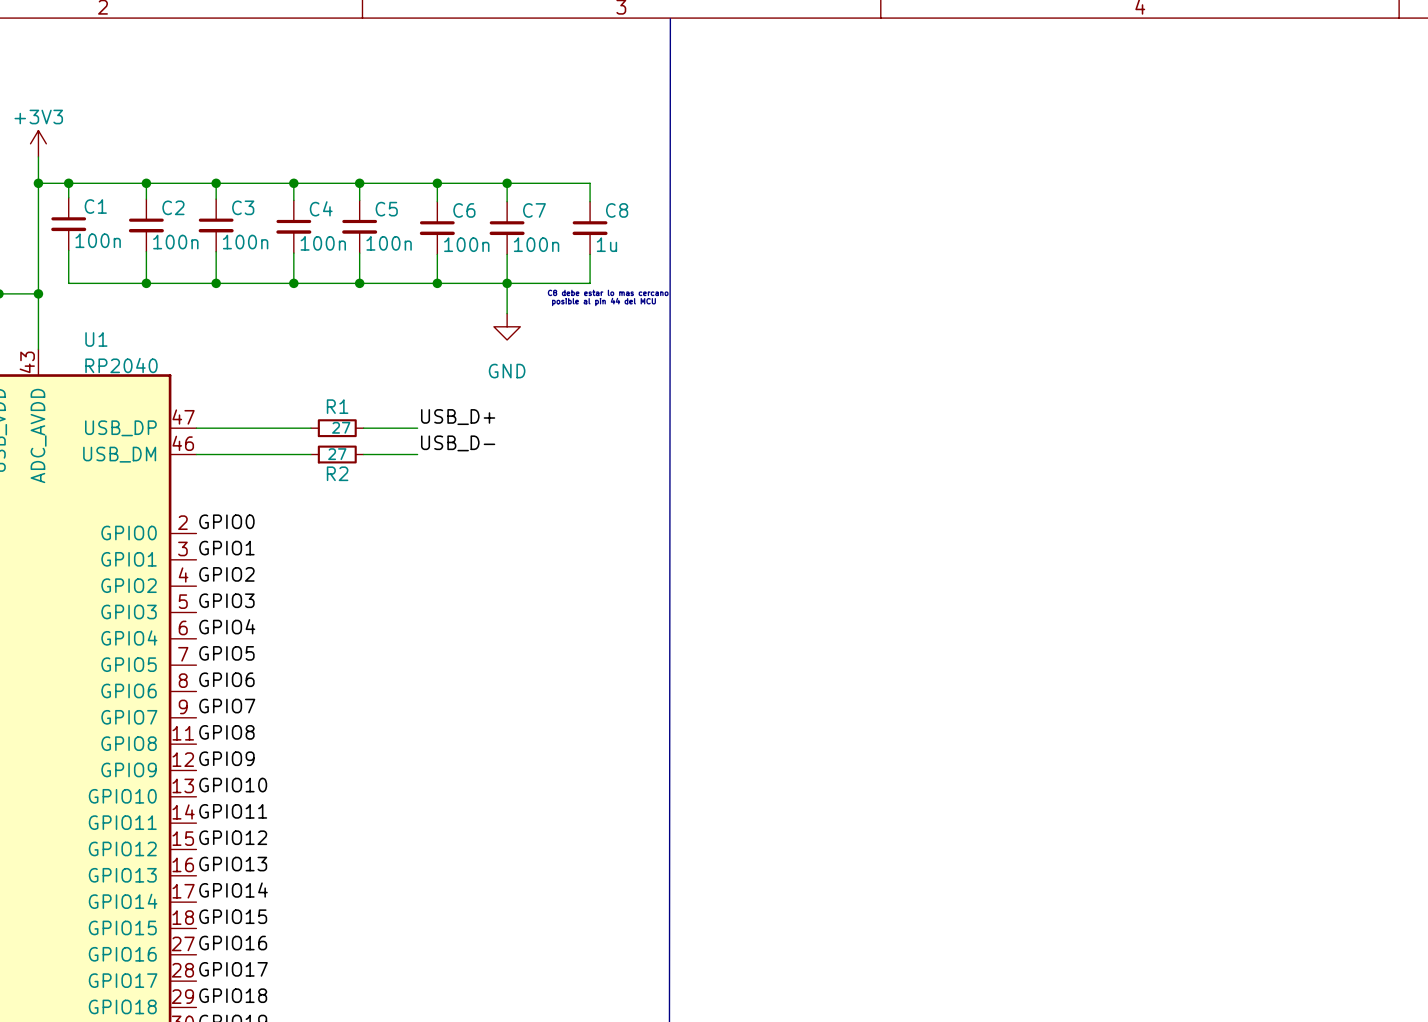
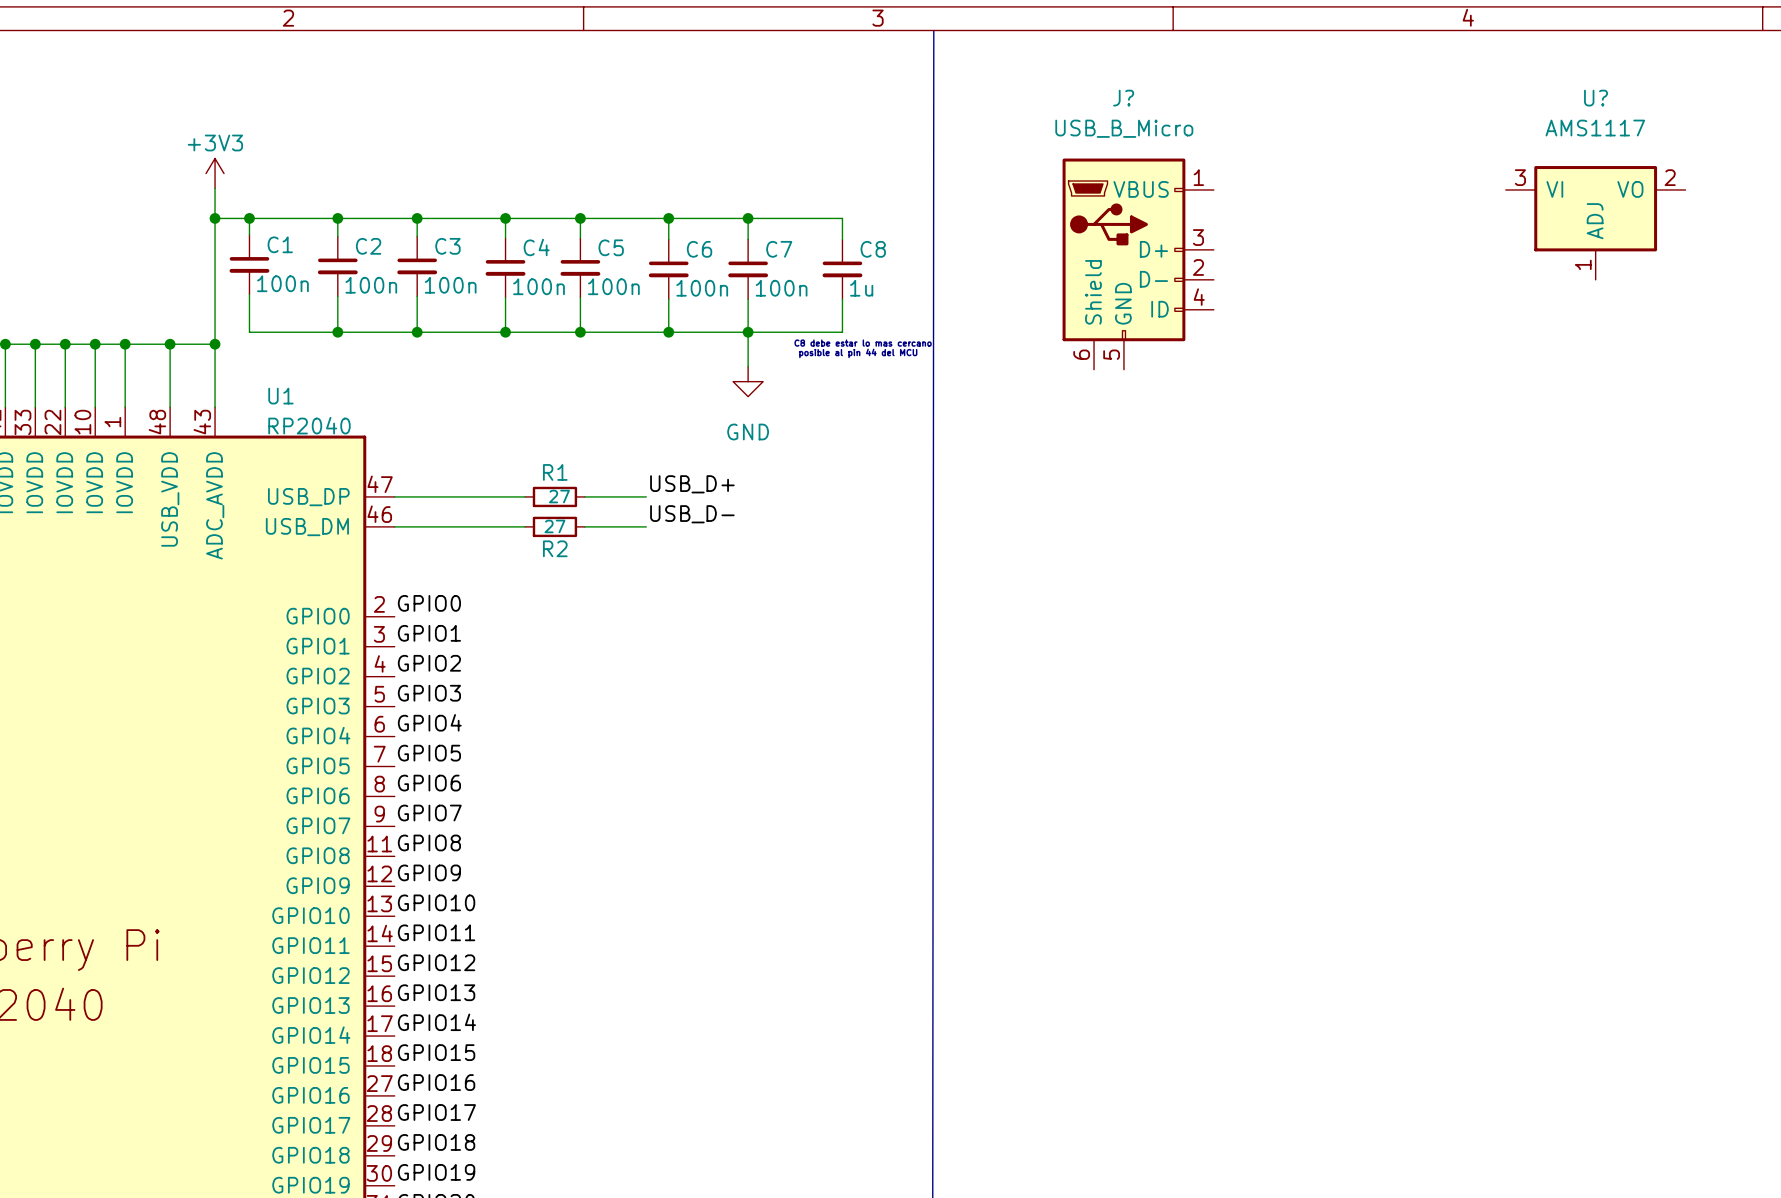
U?: none -> AMS1117 (1595, 222)
J?: none -> USB_B_Micro (1138, 264)

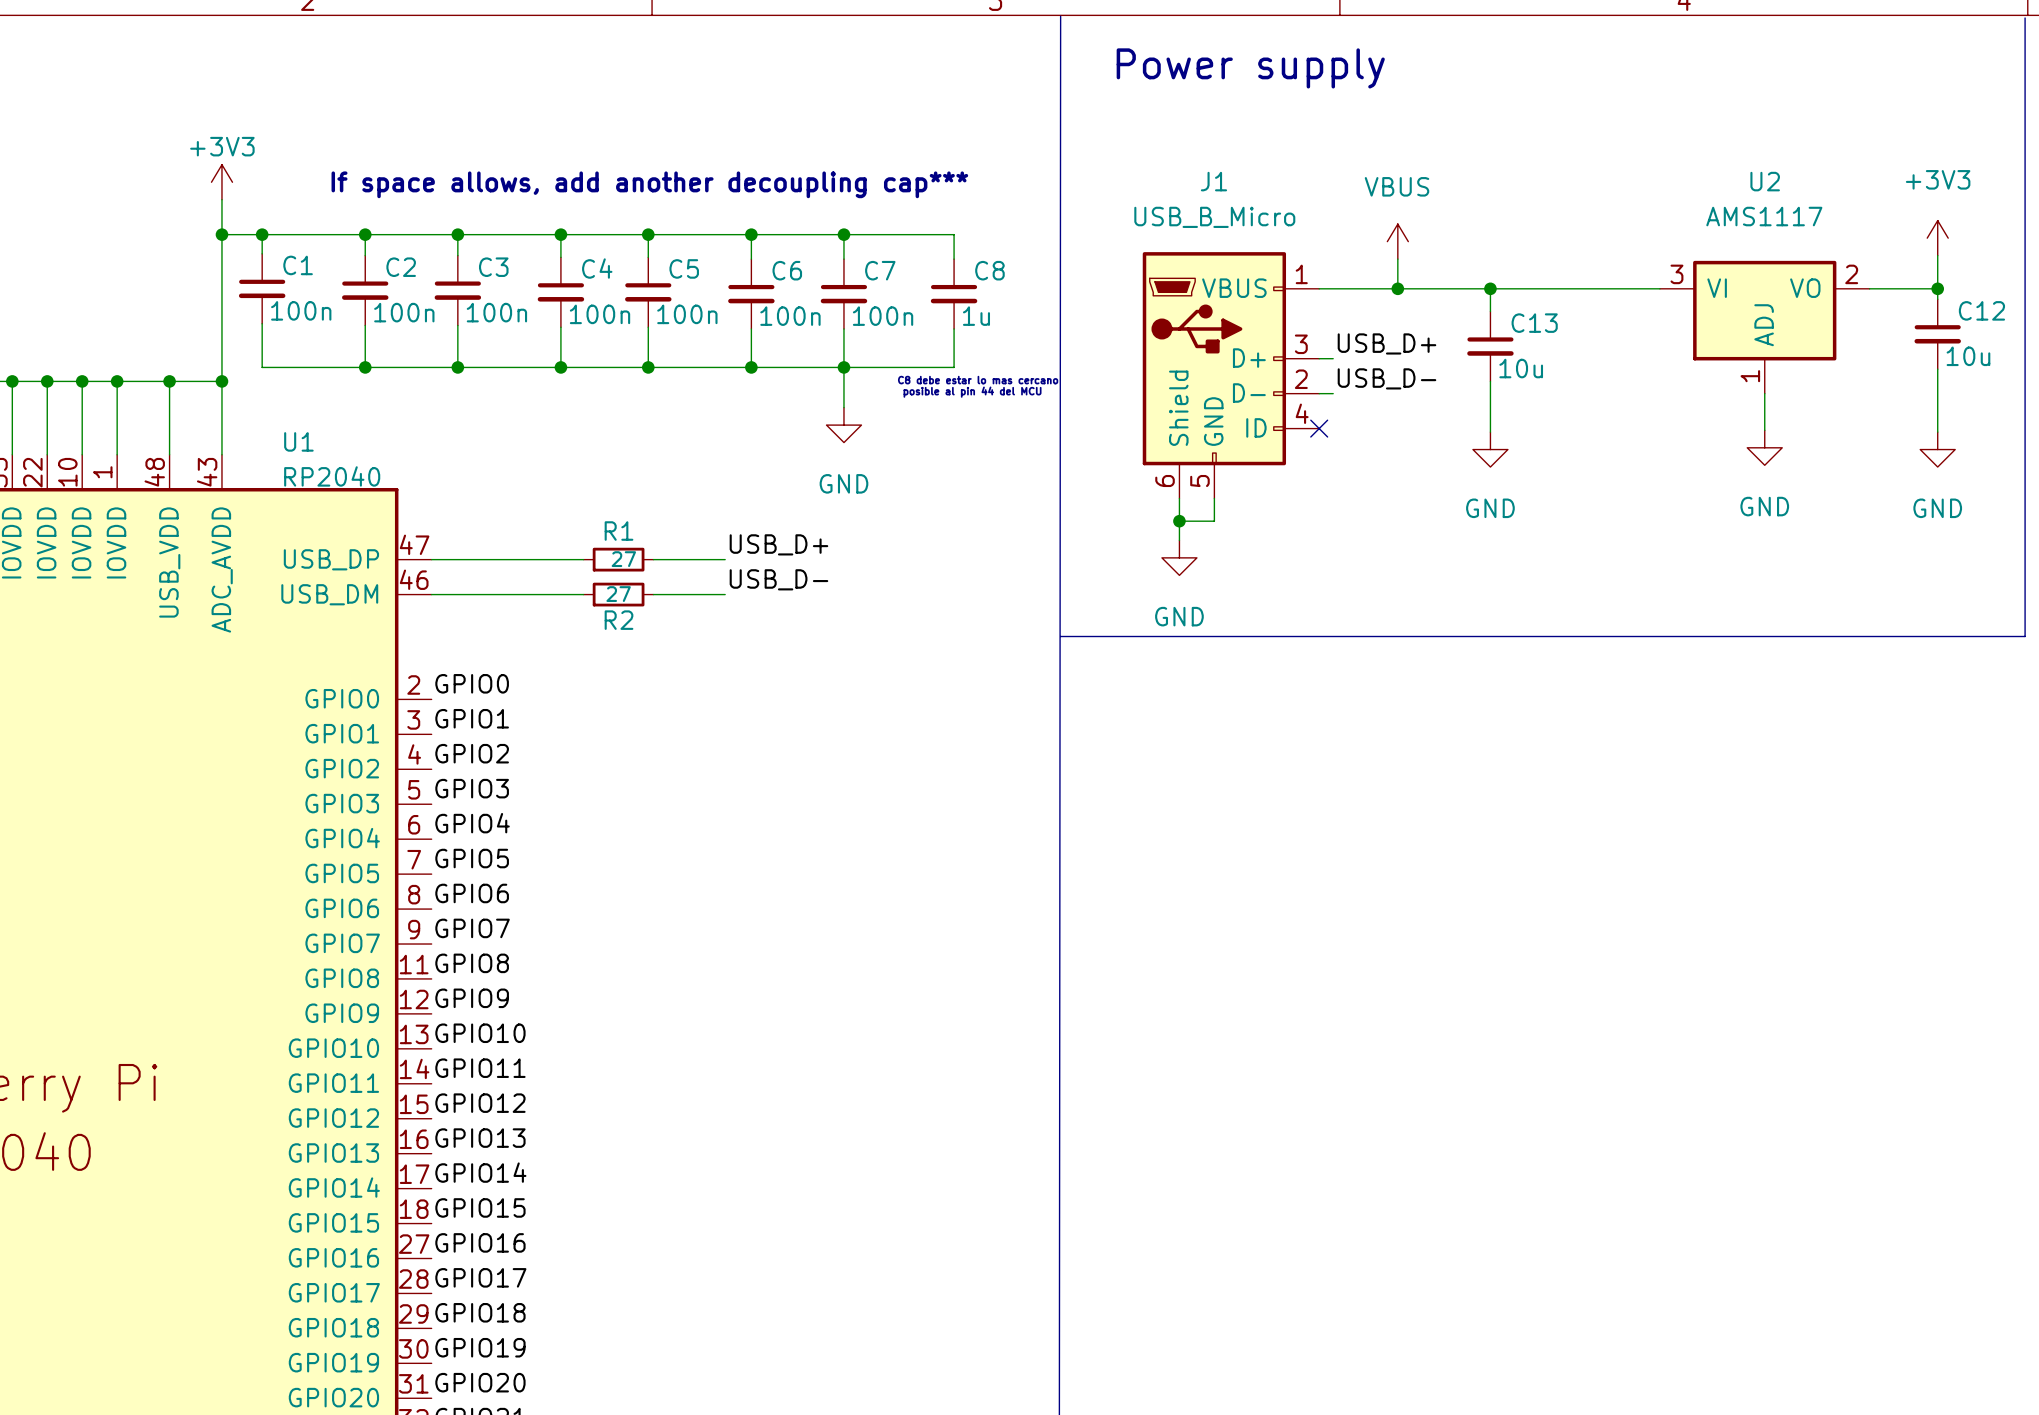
line: none -> (2025, 18) (2025, 636) (1060, 636)
text: none -> Power supply (1250, 68)
text: none -> If space allows, add another decoupling cap*** (649, 184)
power symbol: none -> +3V3 (1937, 238)
U?: AMS1117 (1595, 222) -> none
power symbol: none -> VBUS (1397, 241)
wire: none -> (1937, 255) (1937, 299)
wire: none -> (1397, 259) (1397, 288)
J?: USB_B_Micro (1138, 264) -> none
wire: none -> (1319, 288) (1659, 288)
junction: none -> (1397, 288)
wire: none -> (1490, 288) (1490, 311)
junction: none -> (1490, 288)
wire: none -> (1869, 288) (1937, 288)
junction: none -> (1937, 288)
U2: none -> AMS1117 (1764, 327)
C12: none -> 10u (1937, 334)
label: none -> USB_D+ (1386, 343)
C13: none -> 10u (1490, 346)
wire: none -> (1937, 369) (1937, 432)
J1: none -> USB_B_Micro (1230, 375)
label: none -> USB_D- (1386, 378)
wire: none -> (1490, 381) (1490, 432)
wire: none -> (1319, 393) (1333, 393)
wire: none -> (1764, 393) (1764, 430)
no-connect mark: none -> (1319, 428)
power symbol: none -> GND (1764, 447)
power symbol: none -> GND (1490, 449)
power symbol: none -> GND (1937, 449)
wire: none -> (1179, 498) (1179, 540)
wire: none -> (1214, 498) (1214, 521) (1179, 521)
junction: none -> (1179, 521)
power symbol: none -> GND (1179, 557)

